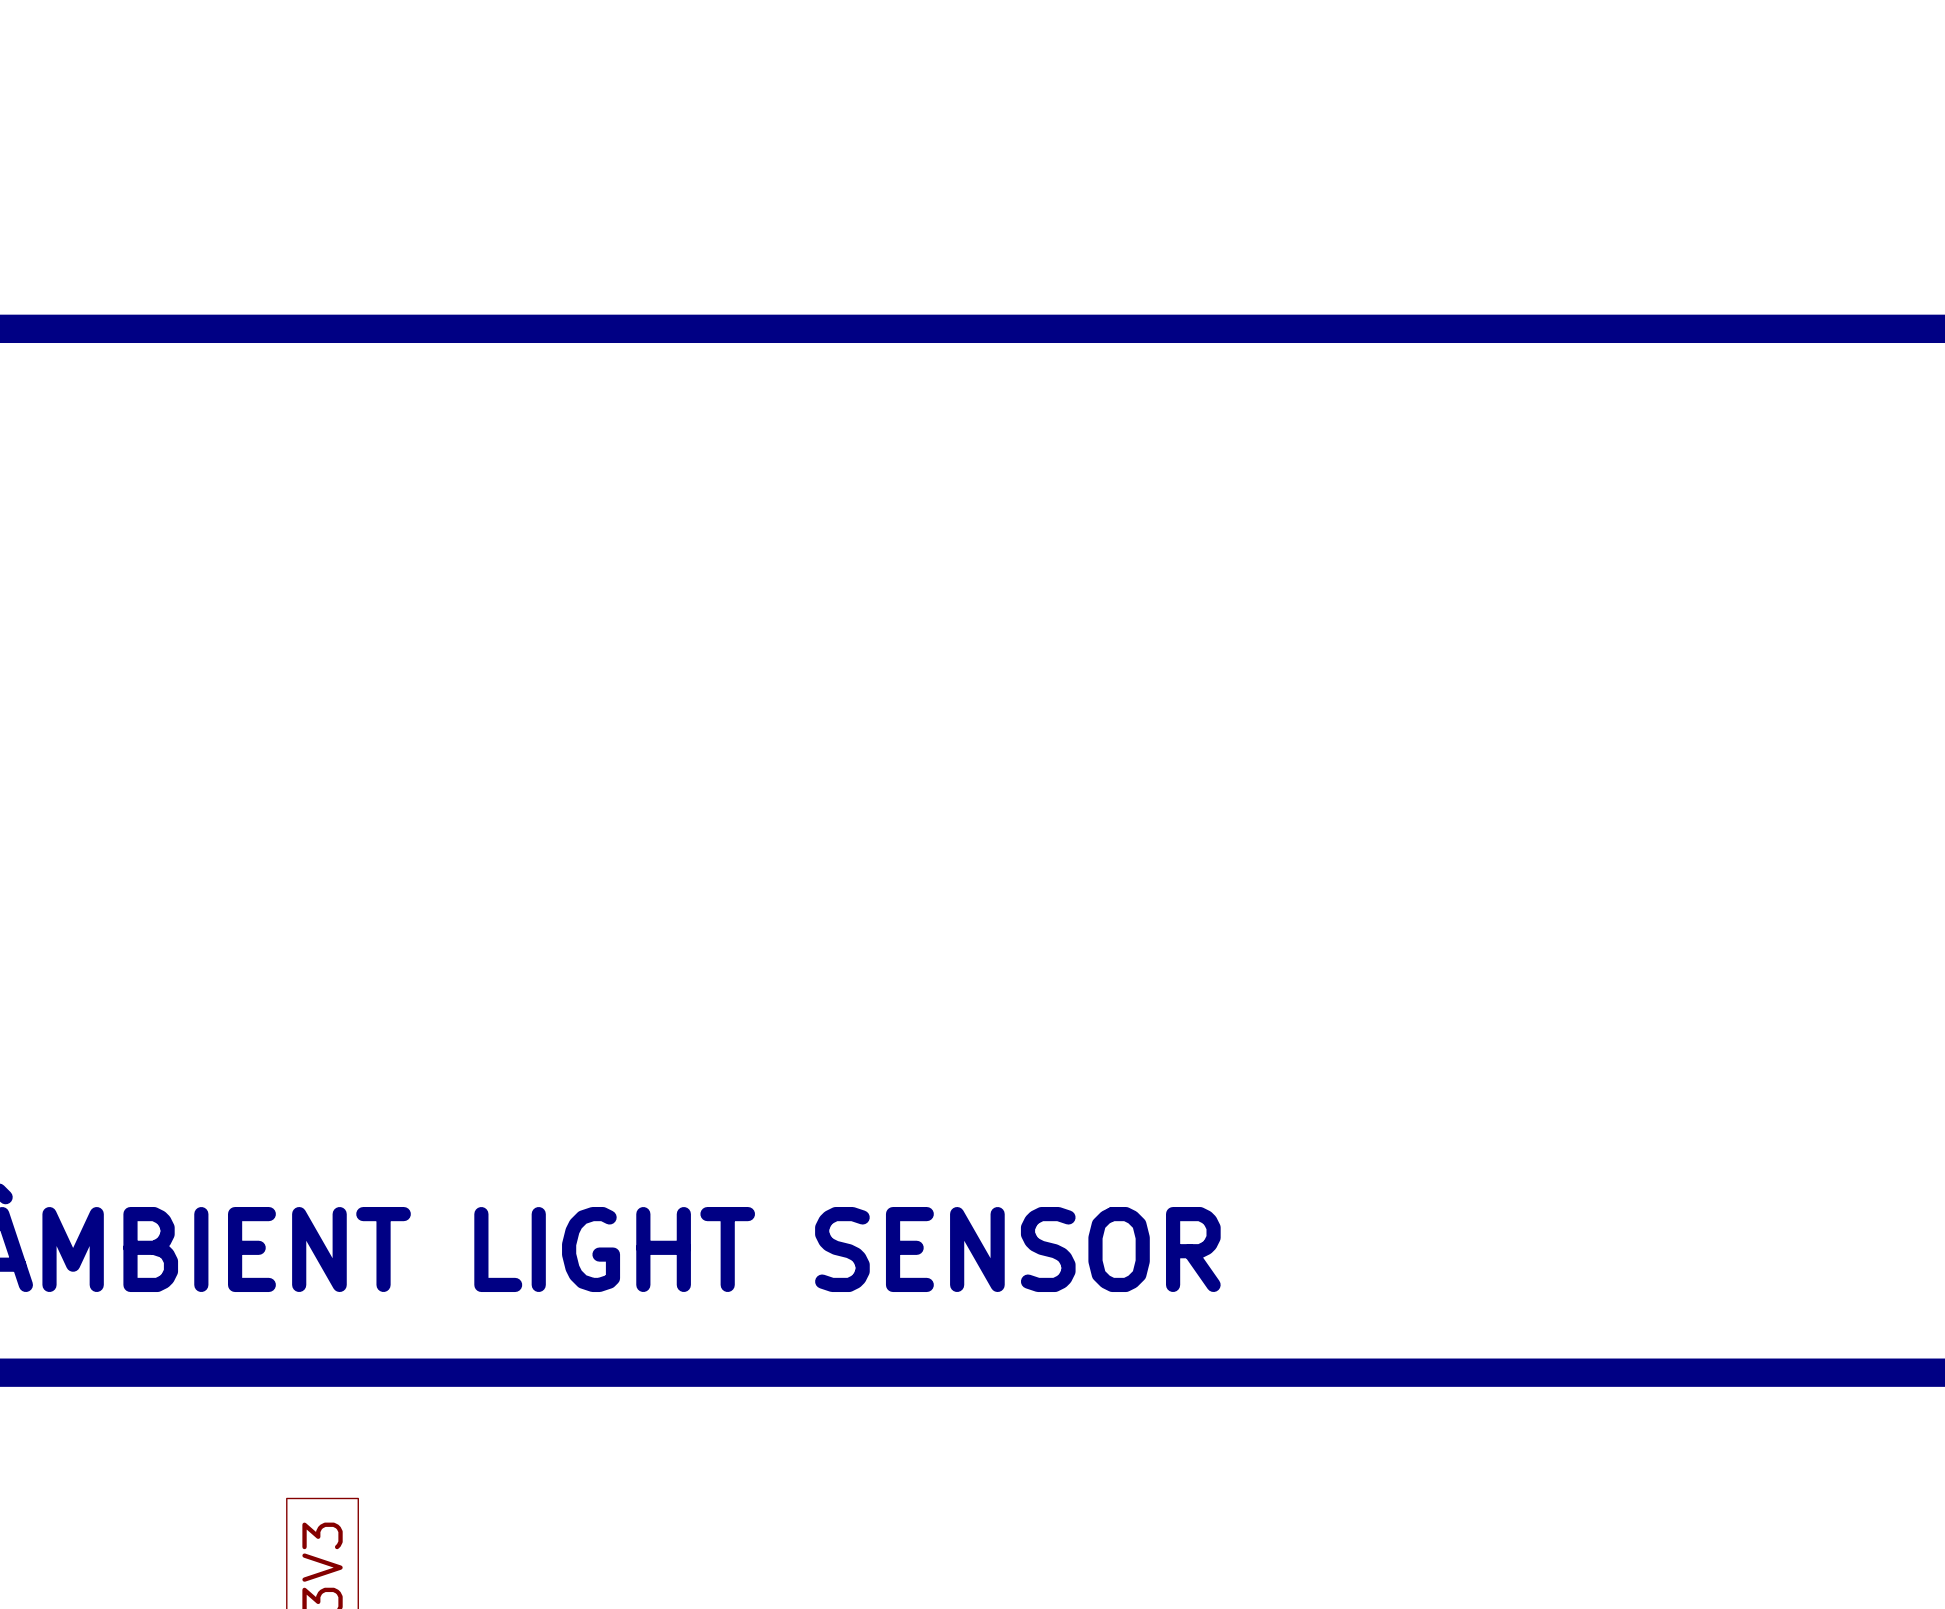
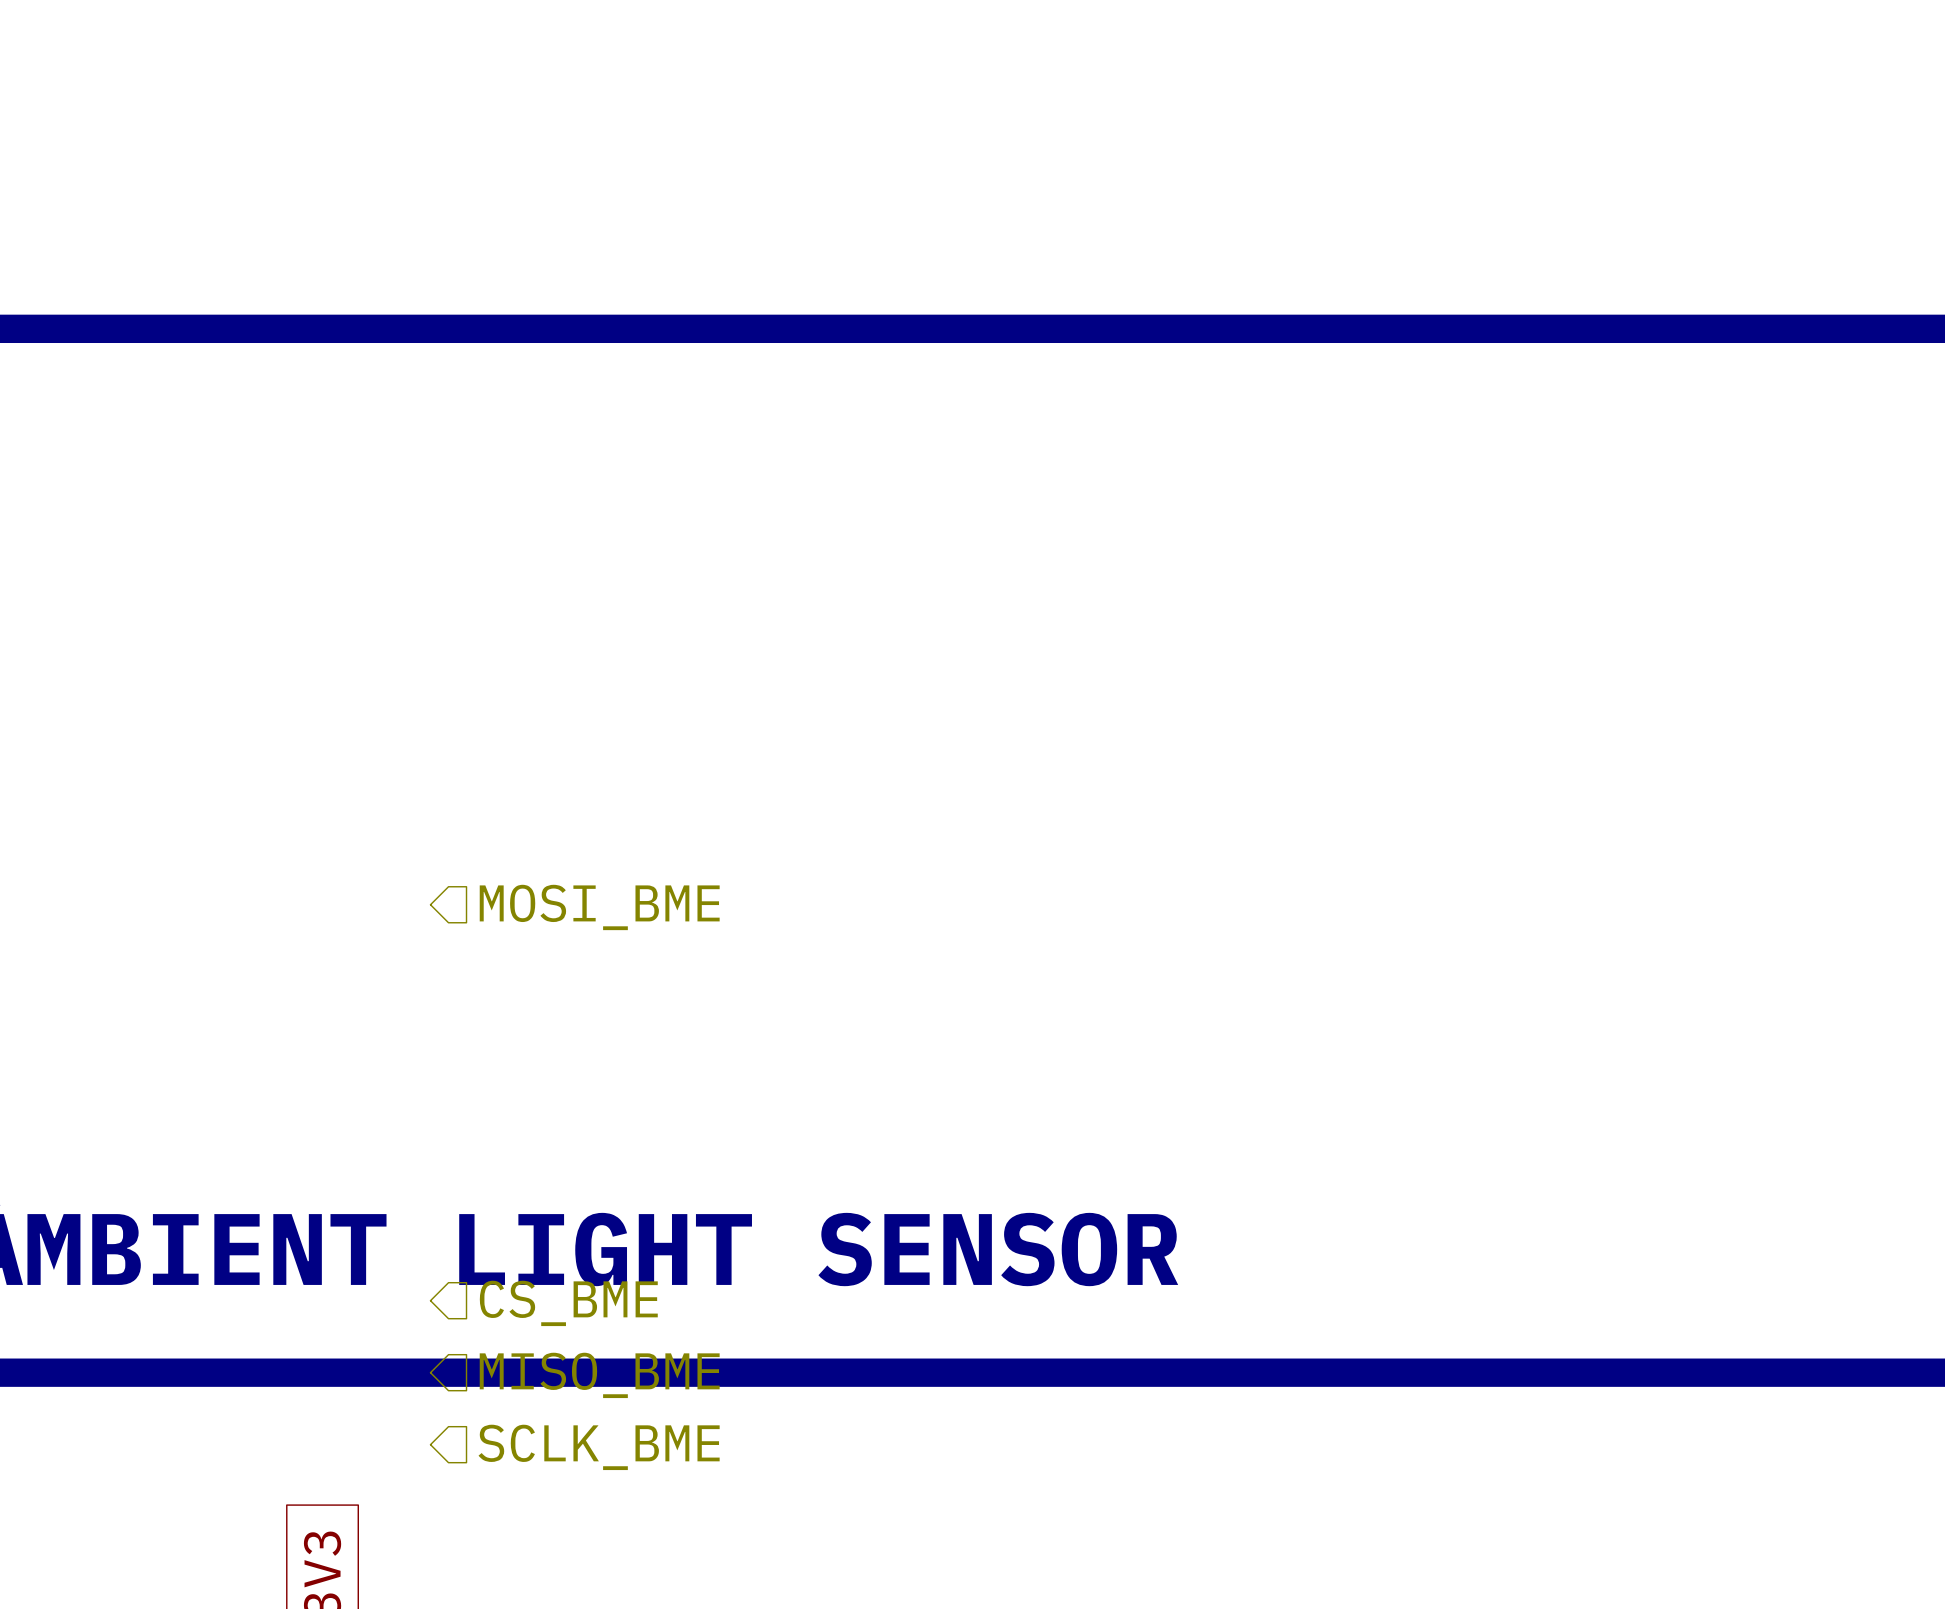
hierarchical label: none -> MOSI_BME (599, 907)
hierarchical label: none -> CS_BME (568, 1303)
hierarchical label: none -> MISO_BME (599, 1375)
hierarchical label: none -> SCLK_BME (599, 1447)

